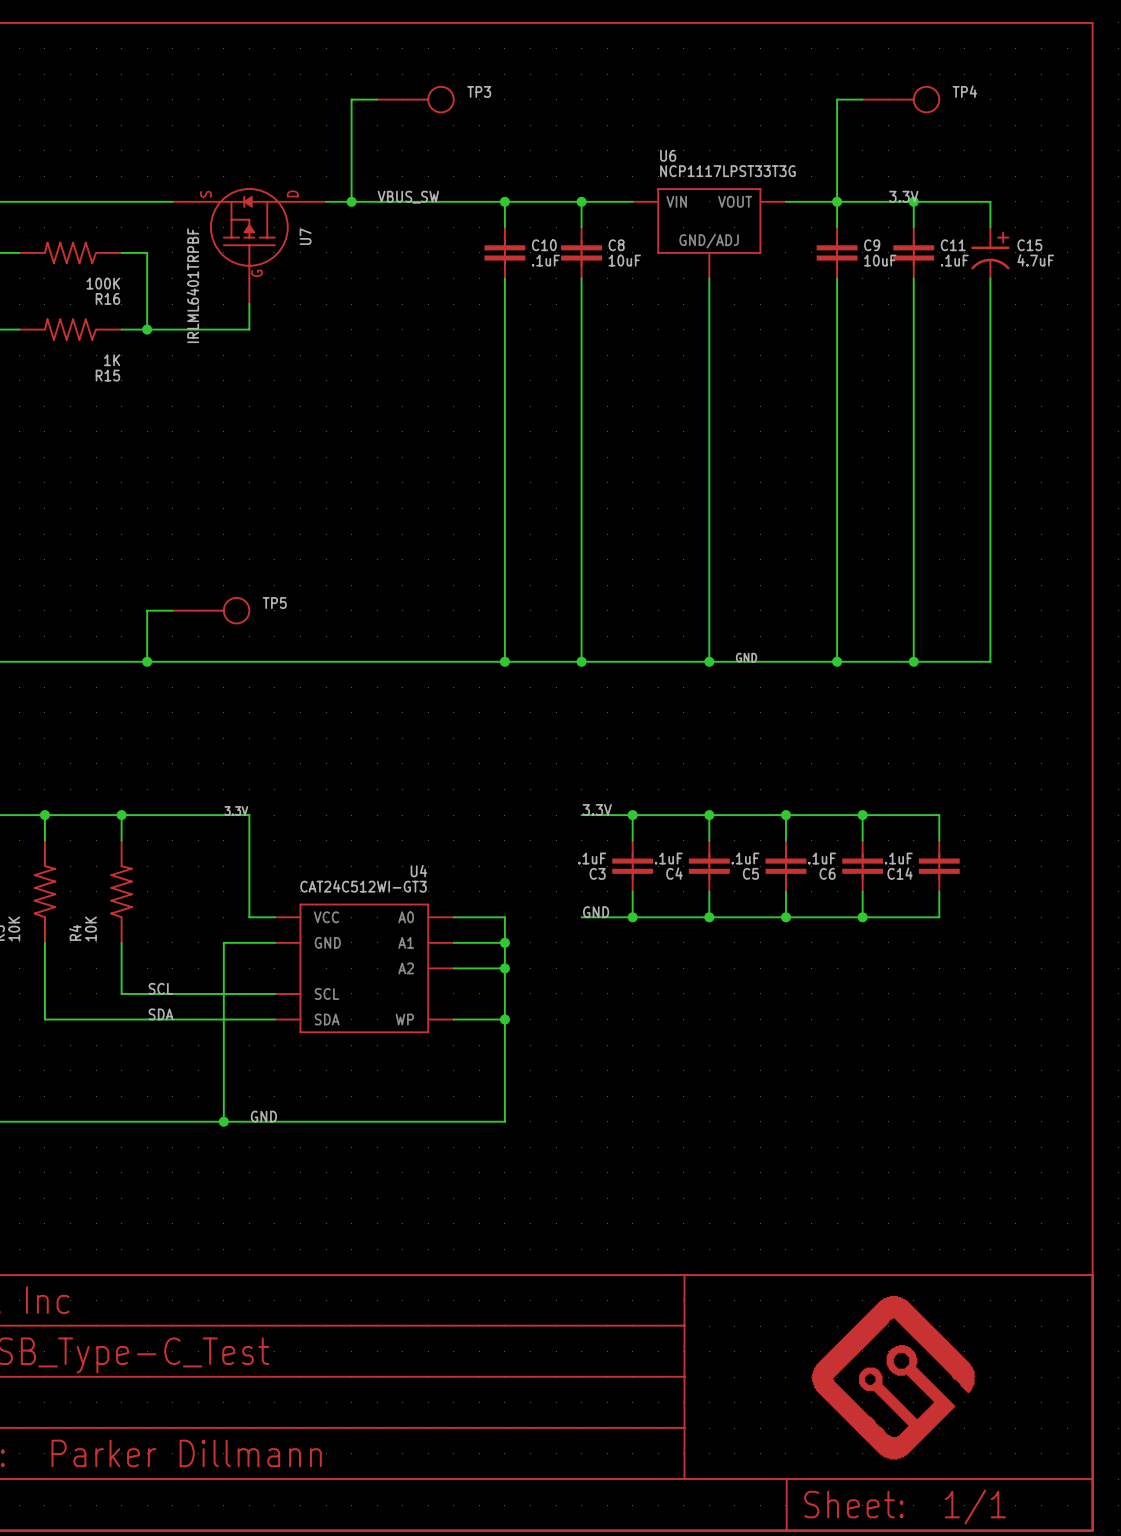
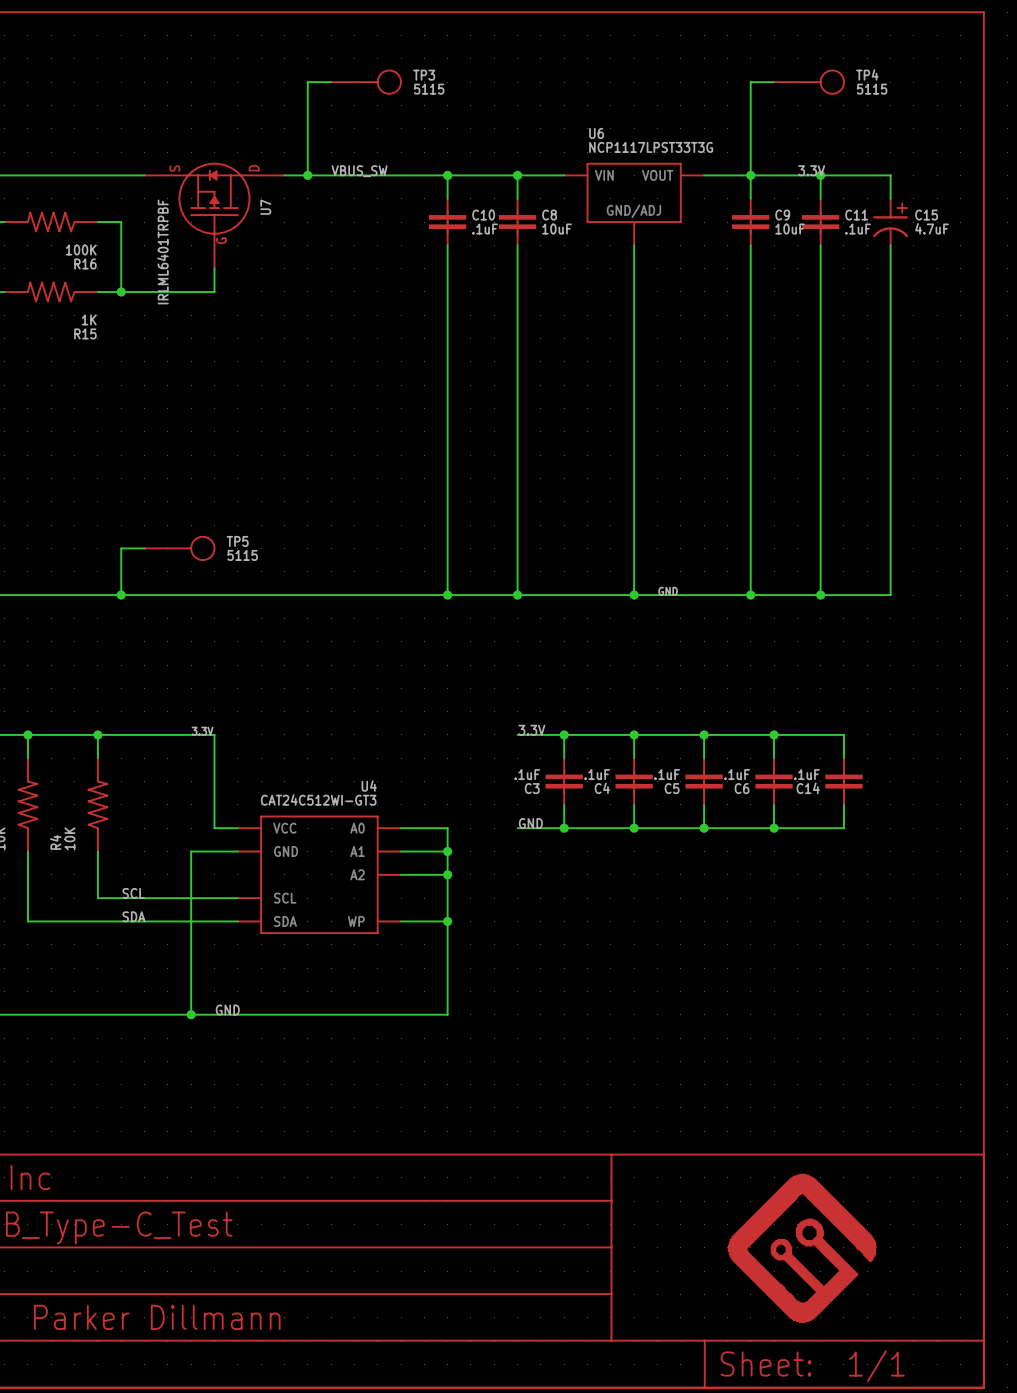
TP3 value: none -> 5115 (429, 89)
TP4 value: none -> 5115 (872, 89)
TP5 value: none -> 5115 (242, 555)

